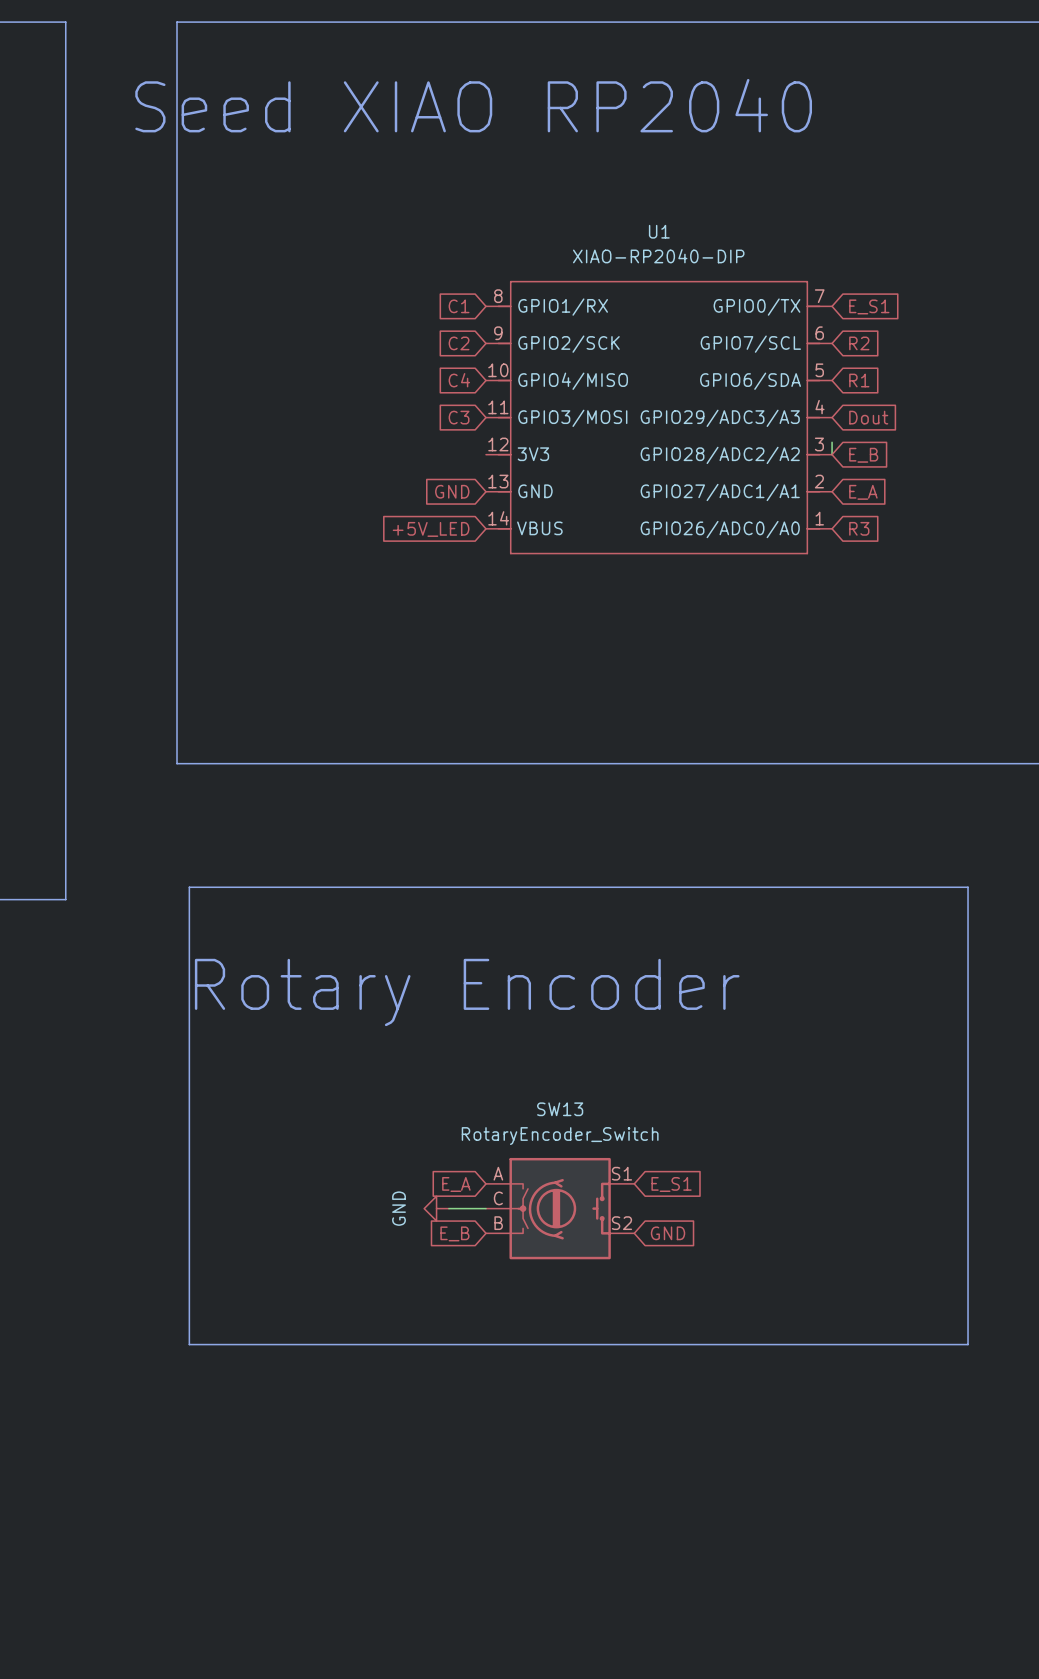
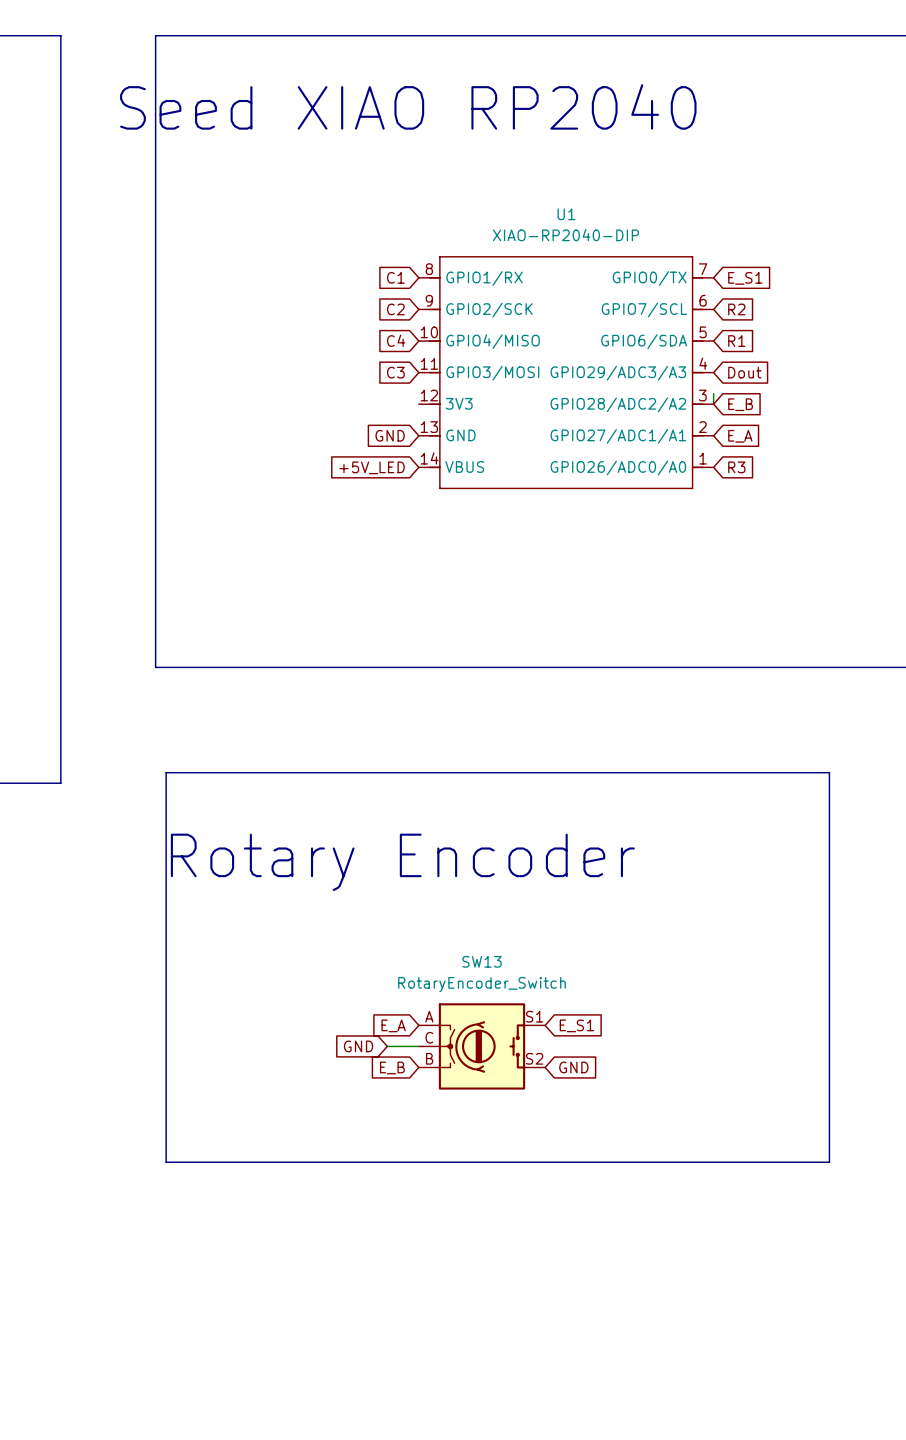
global label: none -> GND (358, 1046)
power symbol: GND (436, 1208) -> none

